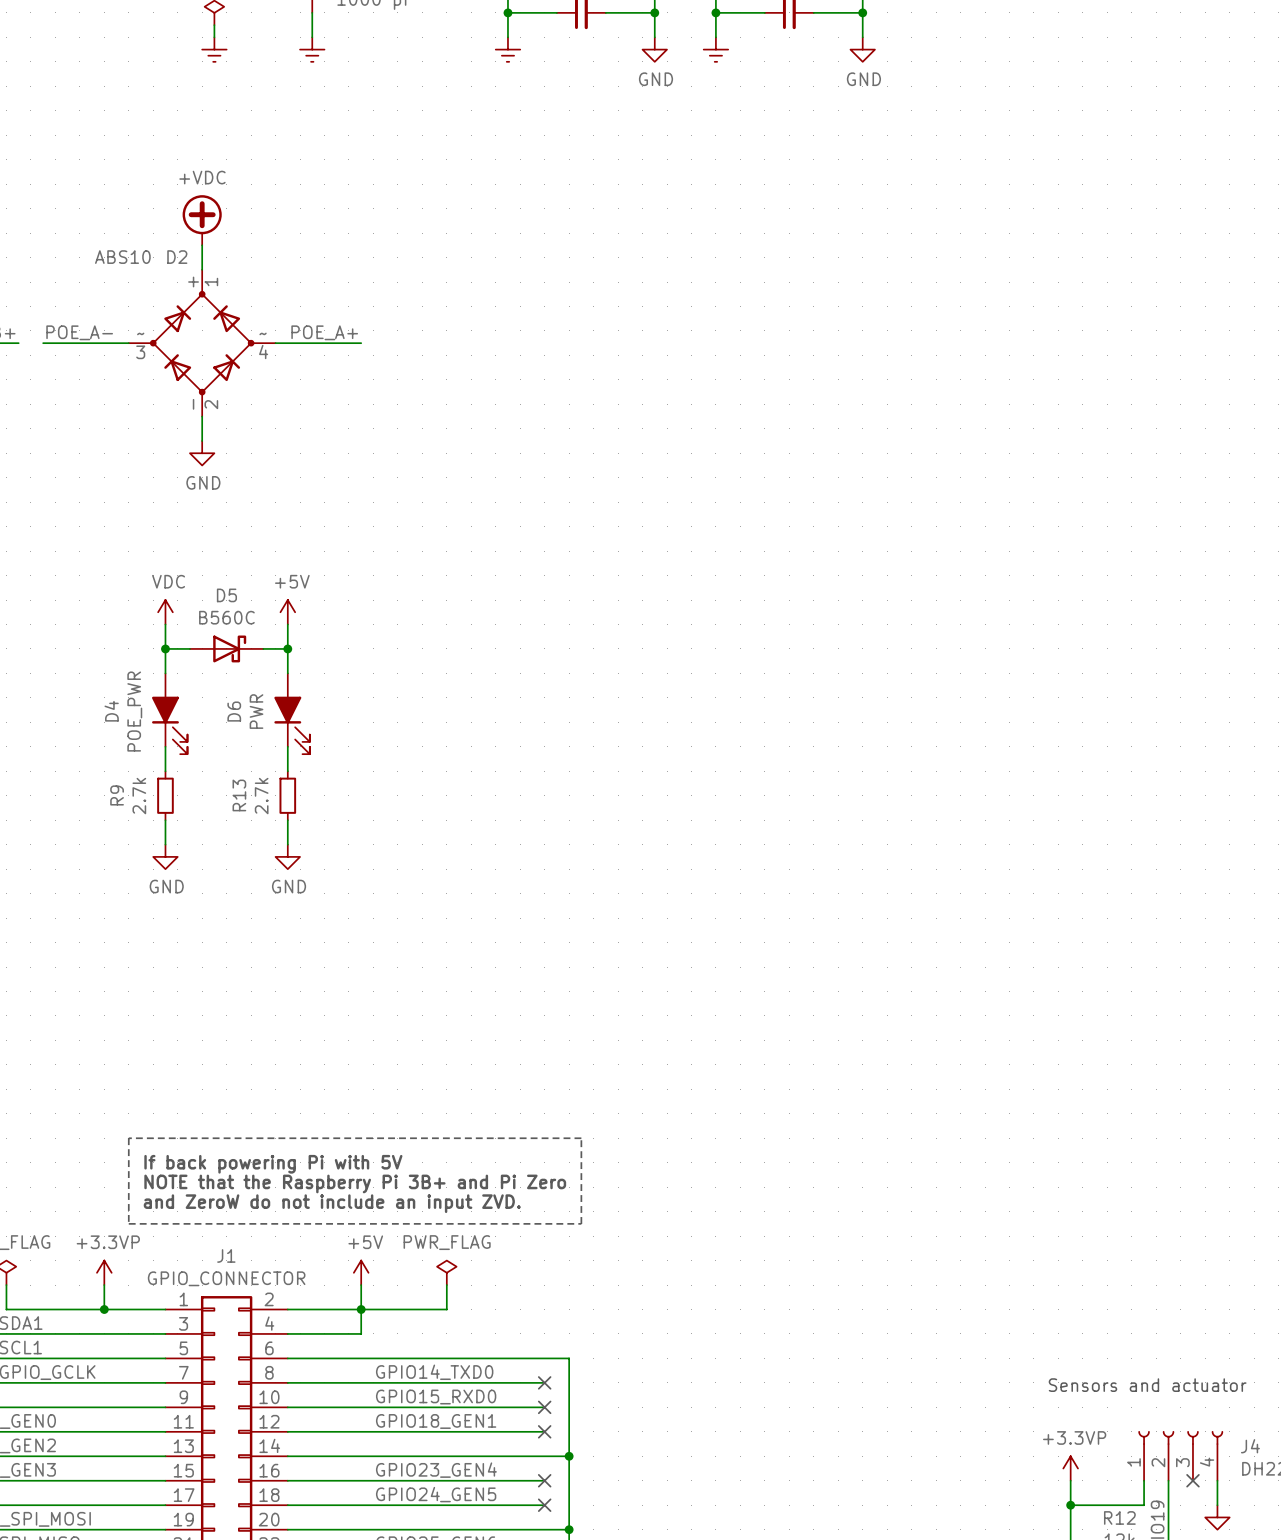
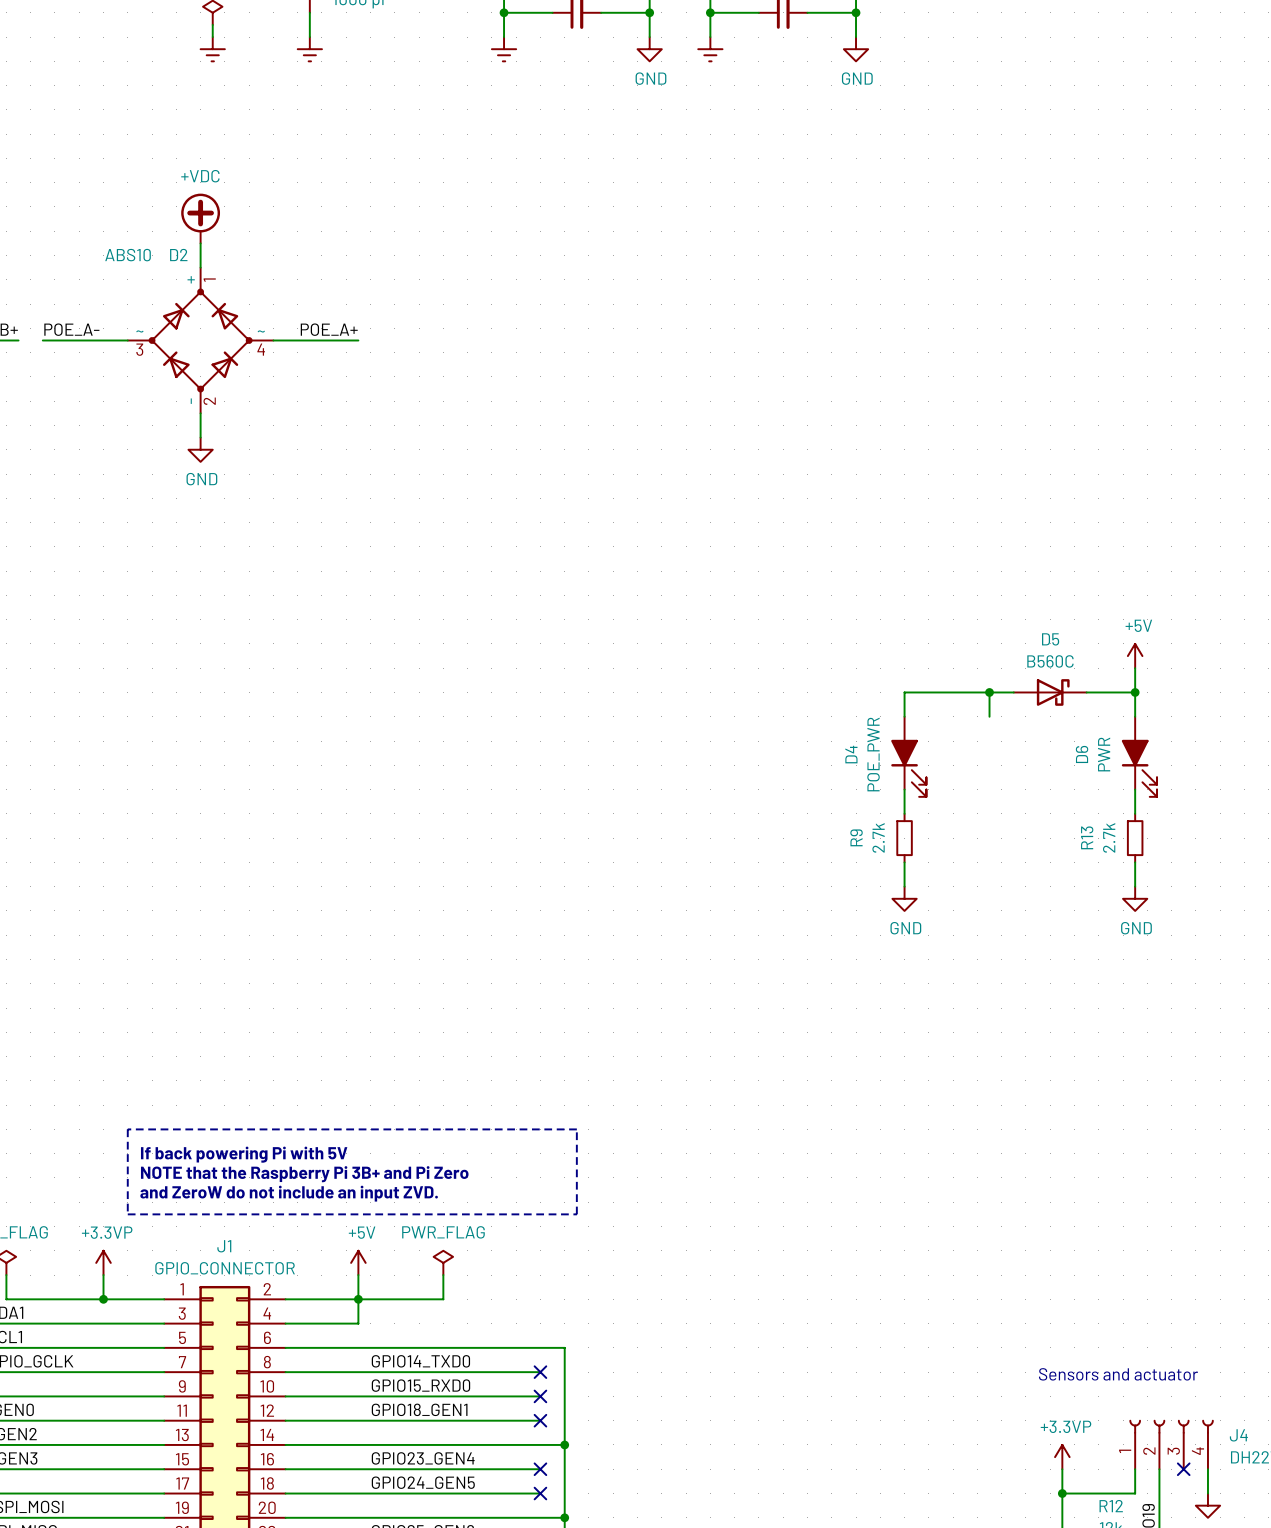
power symbol: VDC (165, 612) -> none
power symbol: +5V (287, 612) -> none
wire: (165, 624) (165, 673) -> none
wire: (287, 624) (287, 673) -> none
wire: (165, 648) (189, 648) -> none
junction: (165, 648) -> none
D5 position: (226, 648) -> (1050, 692)
wire: (263, 648) (287, 648) -> none
junction: (287, 648) -> none
power symbol: none -> +5V (1135, 656)
wire: none -> (1135, 668) (1135, 716)
wire: none -> (989, 692) (989, 716)
junction: none -> (989, 692)
wire: none -> (1013, 692) (904, 692) (904, 716)
wire: none -> (1086, 692) (1135, 692)
junction: none -> (1135, 692)
D4 position: (169, 713) -> (908, 756)
D6 position: (292, 713) -> (1139, 756)
wire: (165, 746) (165, 771) -> none
wire: (287, 746) (287, 771) -> none
R9 position: (165, 795) -> (904, 838)
R13 position: (287, 795) -> (1135, 838)
wire: none -> (904, 789) (904, 813)
wire: none -> (1135, 789) (1135, 813)
wire: (165, 820) (165, 844) -> none
wire: (287, 820) (287, 844) -> none
power symbol: GND (165, 856) -> none
power symbol: GND (287, 856) -> none
wire: none -> (904, 862) (904, 886)
wire: none -> (1135, 862) (1135, 886)
power symbol: none -> GND (904, 898)
power symbol: none -> GND (1135, 898)

